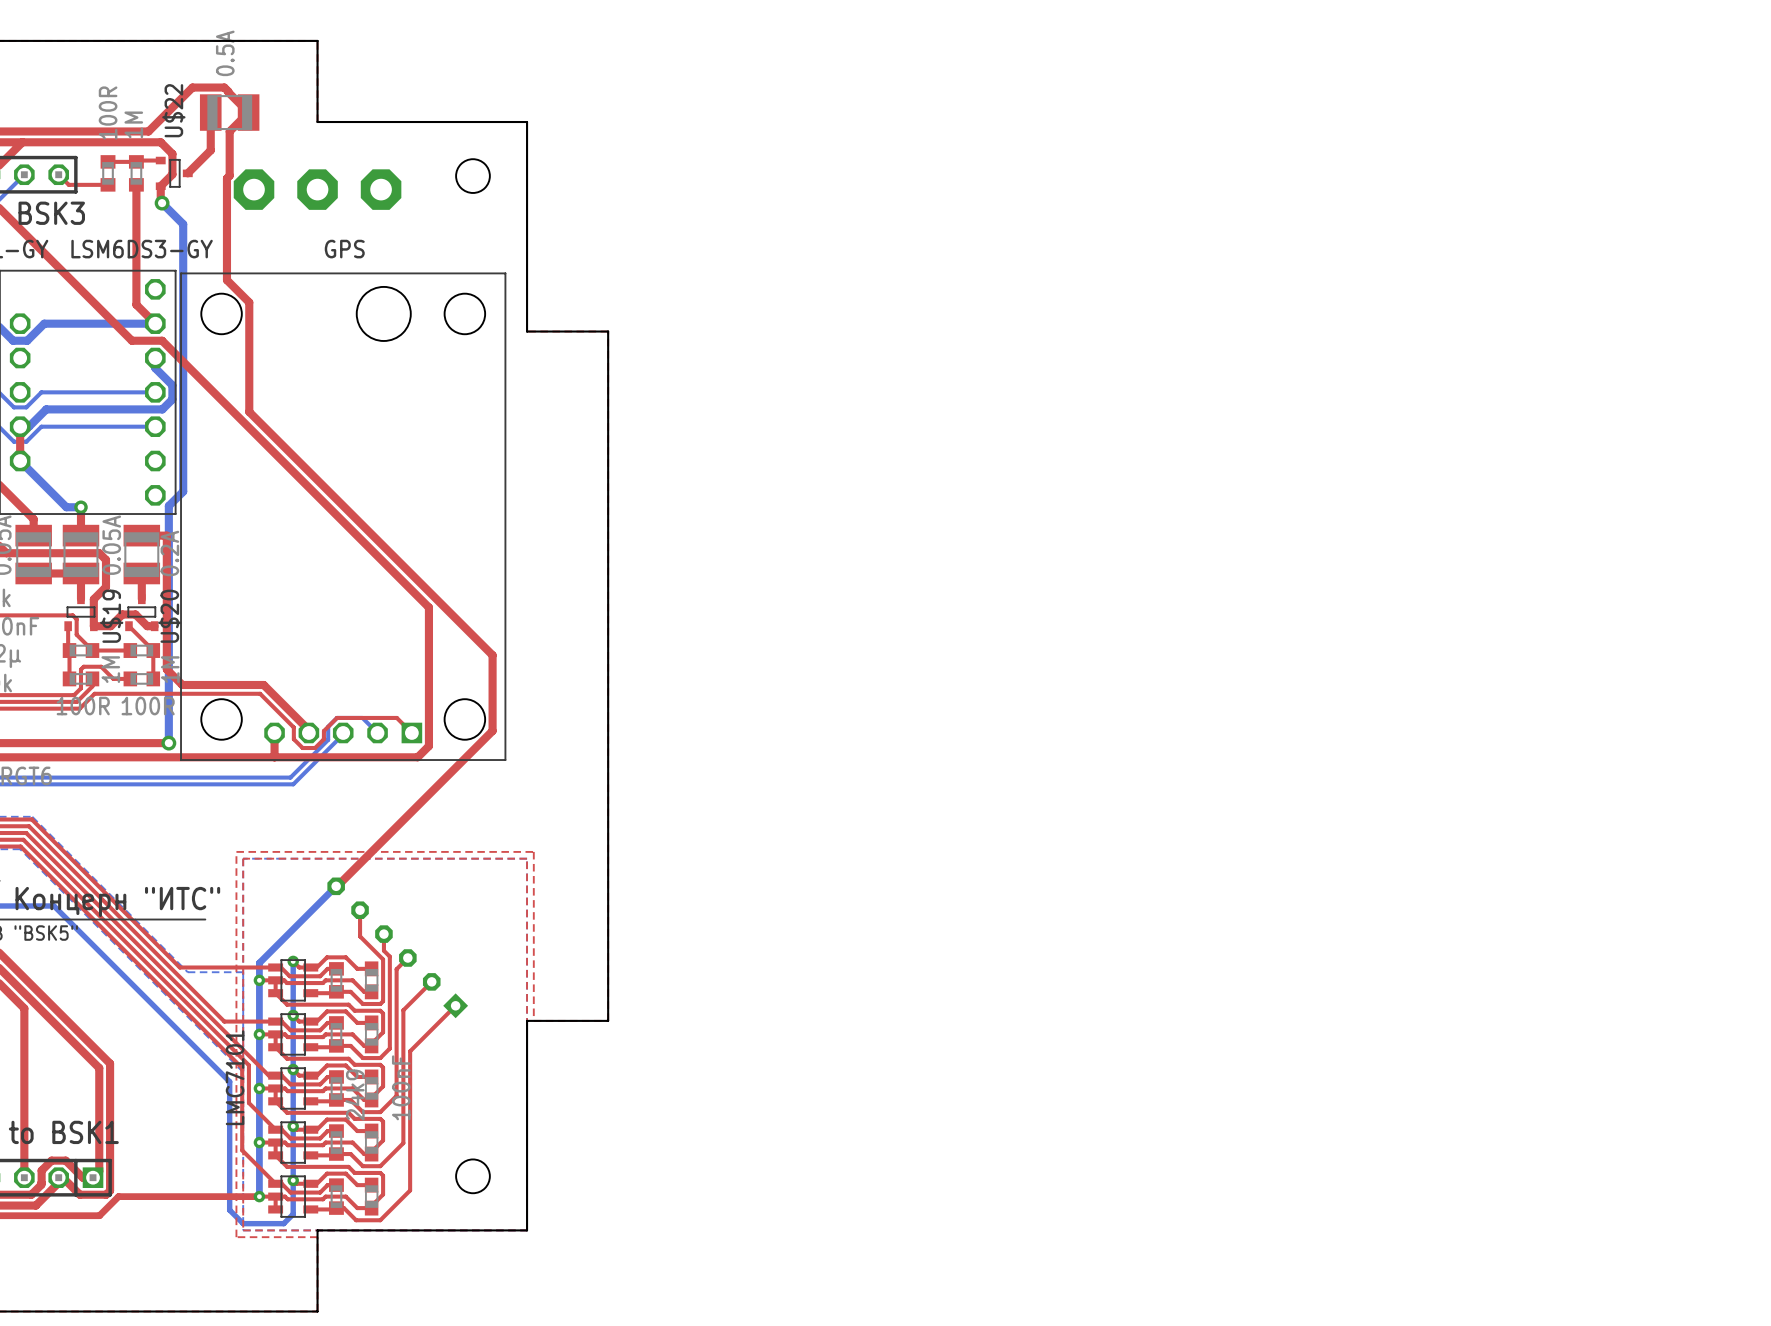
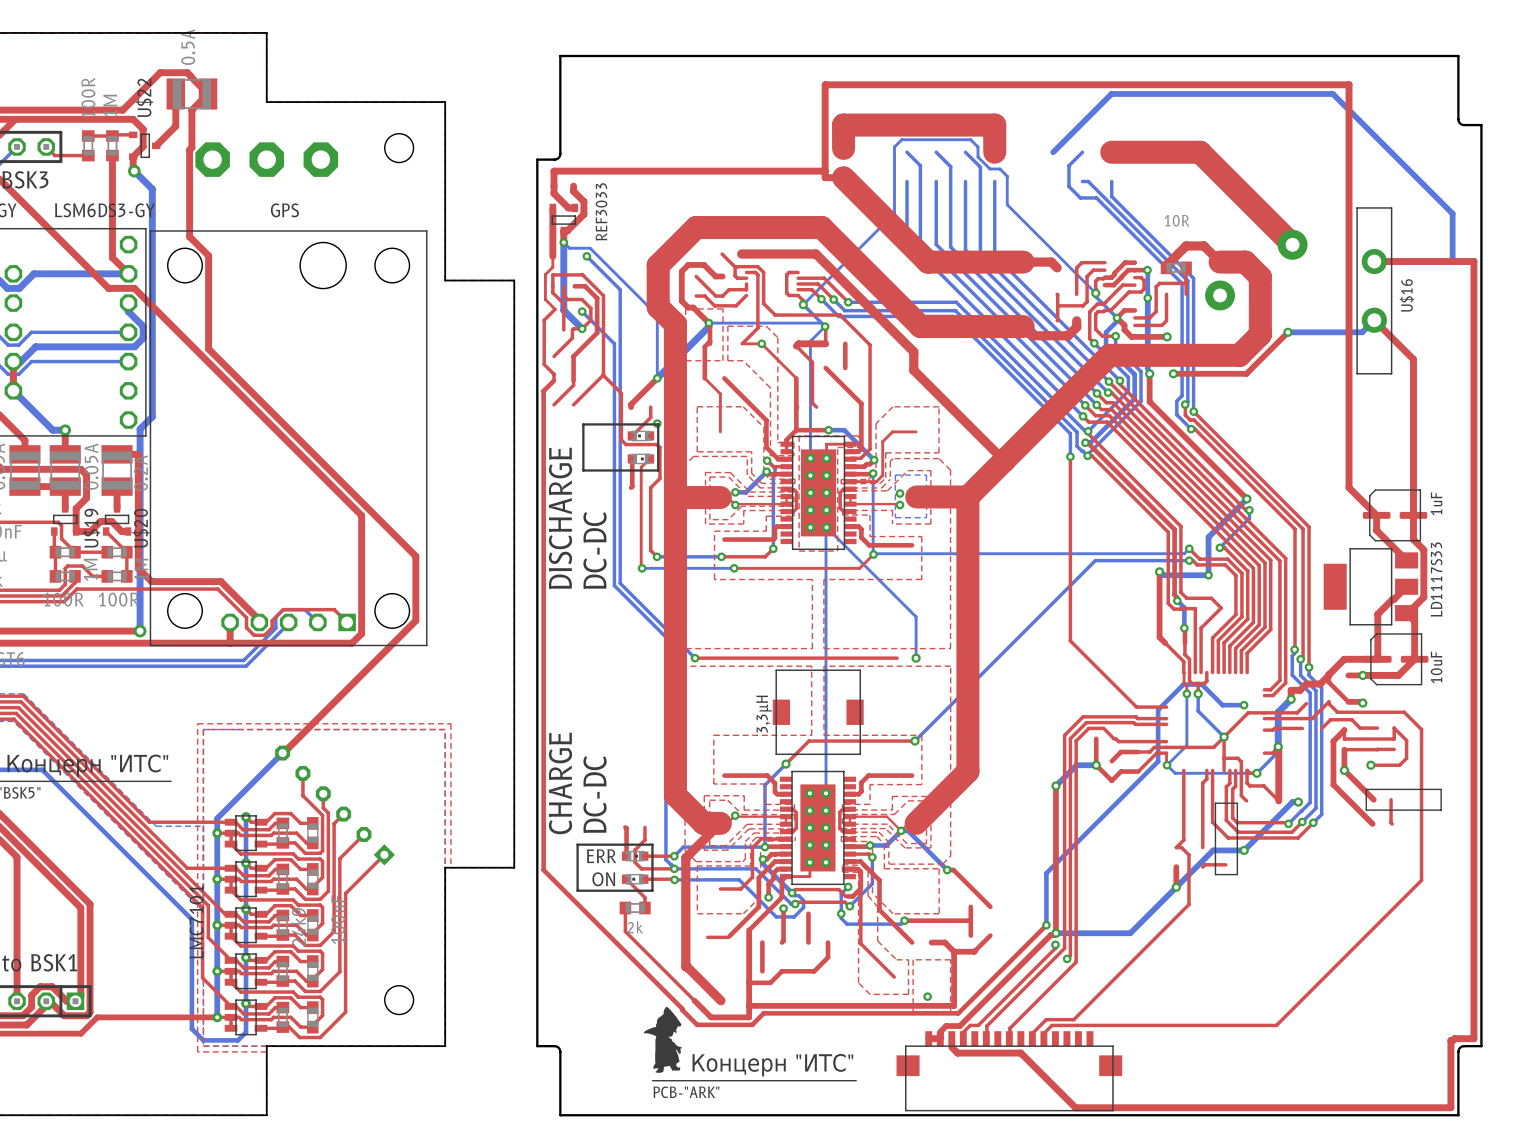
board edge: none -> (560, 55) (1458, 55) (1458, 120) (1463, 125) (1481, 125) (1481, 1046) (1463, 1046) (1458, 1050) (1458, 1115) (560, 1115) (560, 1050) (555, 1046) (537, 1046) (537, 159) (555, 159) (560, 155) (560, 55)
top track: none -> (843, 148) (843, 125) (994, 125) (994, 152)
bottom track: none -> (907, 152) (920, 165) (920, 240) (1085, 405)
bottom track: none -> (936, 152) (950, 166) (950, 247) (1097, 393)
bottom track: none -> (965, 152) (980, 167) (980, 253) (1108, 381)
bottom track: none -> (1053, 152) (1111, 93) (1332, 93) (1452, 213) (1452, 261) (1374, 261)
bottom track: none -> (1082, 152) (1068, 165) (1068, 186) (1080, 197) (1096, 197) (1182, 283) (1182, 395) (1176, 401) (1176, 414) (1191, 429)
top track: none -> (1111, 152) (1200, 152) (1292, 244)
top track: none -> (825, 171) (554, 171) (554, 193) (568, 207) (574, 207)
bottom track: none -> (907, 181) (907, 240) (1083, 416)
bottom track: none -> (936, 181) (936, 244) (1096, 405)
bottom track: none -> (965, 181) (965, 250) (1108, 392)
bottom track: none -> (994, 181) (994, 255) (1119, 380)
bottom track: none -> (1082, 181) (1088, 181) (1187, 281) (1187, 401) (1185, 404)
bottom track: none -> (1111, 181) (1111, 196) (1193, 278) (1193, 411)
top track: none -> (573, 186) (573, 191) (583, 201) (583, 214) (567, 231) (563, 231) (563, 242)
top track: none -> (552, 207) (552, 267) (545, 274) (545, 299) (555, 309) (544, 320) (544, 364) (554, 374) (554, 380) (543, 391) (543, 870) (697, 1024) (752, 1024) (763, 1013) (958, 1013) (1046, 925)
REF3033: none -> (563, 219)
via: none -> (563, 242)
via: none -> (1292, 244)
top track: none -> (722, 254) (735, 267)
top track: none -> (741, 254) (815, 254) (913, 351) (913, 370) (1004, 460)
bottom track: none -> (586, 256) (620, 289) (620, 583) (695, 658)
via: none -> (586, 256)
top track: none -> (1374, 261) (1473, 261) (1473, 1038) (1450, 1040) (1450, 1107) (1075, 1107) (1020, 1053) (957, 1053) (951, 1047) (951, 1038)
top track: none -> (1104, 262) (1081, 262) (1076, 267) (1076, 294)
top track: none -> (1134, 262) (1125, 262) (1111, 277) (1098, 278) (1095, 281) (1095, 293)
top track: none -> (735, 267) (735, 275) (737, 278) (746, 278)
top track: none -> (735, 267) (757, 266) (763, 272) (763, 303) (775, 315) (840, 315) (870, 344) (870, 449) (860, 458) (850, 459)
top track: none -> (1057, 267) (1051, 262) (927, 262) (843, 177) (825, 177) (825, 84) (1349, 84) (1349, 487) (1376, 515) (1376, 530) (1406, 560)
top track: none -> (1166, 267) (1166, 265) (1186, 245) (1203, 245) (1220, 262) (1245, 262) (1260, 277) (1260, 334) (1239, 355) (1109, 355) (967, 496)
part: none -> 10R (1176, 267)
top track: none -> (1186, 267) (1186, 294)
top track: none -> (1104, 270) (1093, 270) (1087, 276) (1087, 301) (1082, 305) (1057, 305)
top track: none -> (1147, 270) (1128, 270) (1113, 285) (1104, 285)
bottom track: none -> (1147, 270) (1147, 368)
via: none -> (1147, 270)
top track: none -> (746, 272) (755, 272) (757, 274) (757, 328) (742, 343)
top track: none -> (798, 272) (789, 272) (786, 274) (786, 293) (789, 295) (798, 295) (803, 300) (803, 304)
top track: none -> (696, 276) (715, 296) (722, 296) (729, 289) (746, 289) (746, 283)
top track: none -> (722, 276) (715, 276) (704, 264) (688, 264) (681, 271) (681, 301) (688, 307) (693, 307) (710, 324) (710, 343)
top track: none -> (798, 278) (824, 278) (848, 302)
top track: none -> (1134, 277) (1141, 277) (1144, 280) (1144, 289) (1141, 292) (1129, 292) (1110, 310) (1098, 311) (1095, 313) (1095, 329) (1102, 336) (1115, 336)
top track: none -> (1186, 282) (1159, 283) (1156, 286) (1156, 311) (1149, 317) (1134, 317)
top track: none -> (798, 283) (818, 283) (833, 299)
top track: none -> (1134, 285) (1122, 285) (1103, 304) (1097, 304) (1089, 311) (1089, 338) (1094, 343)
top track: none -> (563, 286) (563, 295) (567, 299) (581, 299) (590, 308) (590, 320) (582, 328) (573, 328) (572, 338) (554, 356)
top track: none -> (574, 286) (585, 286) (597, 298) (597, 332) (573, 356) (573, 385) (554, 404)
top track: none -> (798, 289) (811, 289) (821, 299)
U$16: none -> (1374, 290)
via: none -> (1095, 293)
top track: none -> (1057, 294) (1057, 320)
top track: none -> (1166, 294) (1166, 320) (1161, 325) (1134, 325)
top track: none -> (746, 295) (736, 305) (714, 305) (704, 296) (696, 296)
via: none -> (1220, 295)
via: none -> (1147, 298)
bottom track: none -> (821, 299) (838, 316) (953, 316) (1070, 433) (1070, 456)
via: none -> (821, 299)
bottom track: none -> (833, 299) (844, 310) (955, 310) (1077, 432) (1077, 446) (1087, 455) (1140, 401) (1140, 371) (1115, 346) (1115, 336)
via: none -> (833, 299)
bottom track: none -> (848, 302) (956, 302) (1085, 431) (1088, 431) (1128, 391) (1128, 377) (1094, 343)
via: none -> (848, 302)
via: none -> (803, 304)
top zone outline: none -> (685, 308) (723, 308) (723, 360) (685, 360) (685, 308)
top track: none -> (1134, 310) (1124, 310) (1117, 317) (1131, 336) (1167, 336)
bottom track: none -> (582, 311) (614, 343) (614, 585) (665, 637) (665, 859) (675, 868)
via: none -> (582, 311)
via: none -> (1117, 317)
top track: none -> (1076, 320) (1076, 327) (1068, 335) (1032, 335) (1023, 326) (920, 326) (821, 227) (696, 227) (658, 265) (658, 306) (675, 324) (675, 795) (703, 823) (720, 823)
top track: none -> (1374, 320) (1413, 359) (1413, 539) (1423, 549) (1423, 597) (1406, 613) (1414, 621) (1414, 659) (1398, 675) (1348, 675)
bottom track: none -> (1374, 320) (1362, 332) (1287, 332)
via: none -> (708, 323)
top zone outline: none -> (727, 326) (727, 360) (743, 360) (770, 387) (770, 455) (793, 455) (793, 442) (777, 442) (777, 337) (766, 326) (727, 326)
top track: none -> (825, 326) (825, 343) (798, 343) (796, 346) (812, 362) (812, 403) (816, 407)
bottom track: none -> (825, 326) (803, 304) (894, 213) (894, 147) (901, 139) (970, 139) (978, 147) (978, 157) (989, 168) (999, 168) (1007, 176) (1007, 204) (1095, 293) (1095, 296) (1117, 317) (1117, 321) (1106, 332) (1106, 345) (1134, 374) (1134, 398) (1090, 442) (1085, 442)
bottom track: none -> (825, 326) (810, 341) (810, 458)
bottom track: none -> (825, 326) (821, 323) (708, 323) (708, 326) (657, 378) (657, 315) (590, 248) (569, 248) (563, 242) (563, 310) (582, 328)
via: none -> (825, 326)
via: none -> (582, 328)
top track: none -> (563, 330) (563, 303) (552, 292) (552, 274) (582, 274) (603, 295) (603, 374) (573, 404)
top track: none -> (1287, 332) (1246, 373) (1173, 373)
via: none -> (1287, 332)
via: none -> (1115, 336)
via: none -> (1167, 336)
top track: none -> (710, 341) (704, 346) (704, 378) (720, 393) (720, 431)
top track: none -> (743, 342) (761, 343) (796, 378) (796, 430)
via: none -> (761, 343)
top track: none -> (845, 343) (845, 368)
via: none -> (1094, 343)
top track: none -> (825, 368) (861, 403) (861, 448) (858, 451) (850, 451)
top track: none -> (1149, 373) (1149, 401) (1246, 498)
via: none -> (1149, 373)
via: none -> (1173, 373)
top track: none -> (603, 375) (621, 393) (621, 439) (626, 444) (657, 444) (659, 447) (659, 478) (650, 487) (650, 550) (657, 556)
top track: none -> (657, 378) (631, 404) (631, 407)
via: none -> (657, 378)
top track: none -> (724, 378) (766, 420) (766, 447) (778, 459) (786, 459)
top track: none -> (1119, 380) (1119, 384) (1245, 510) (1249, 510)
via: none -> (1119, 380)
top track: none -> (1108, 381) (1285, 558) (1285, 682) (1272, 695) (1264, 695)
via: none -> (1108, 381)
top track: none -> (1108, 392) (1111, 392) (1279, 561) (1279, 680) (1270, 689) (1264, 689)
via: none -> (1108, 392)
top track: none -> (1097, 393) (1106, 402) (1113, 402) (1270, 560) (1270, 629) (1247, 653) (1247, 672)
via: none -> (1097, 393)
top track: none -> (1096, 405) (1101, 409) (1111, 409) (1264, 562) (1264, 627) (1241, 650) (1241, 672)
via: none -> (1096, 405)
top track: none -> (1185, 404) (1185, 415) (1190, 420) (1193, 420) (1303, 529) (1303, 658) (1300, 659)
via: none -> (1185, 404)
top track: none -> (1085, 405) (1095, 415) (1109, 415) (1259, 565) (1259, 624) (1235, 648) (1235, 672)
via: none -> (1085, 405)
top zone outline: none -> (697, 406) (697, 451) (751, 451) (751, 473) (761, 483) (794, 483) (794, 479) (769, 479) (763, 473) (763, 427) (743, 406) (697, 406)
top zone outline: none -> (892, 406) (939, 406) (939, 452) (885, 452) (885, 477) (879, 483) (841, 483) (841, 479) (868, 479) (876, 471) (876, 423) (892, 406)
top track: none -> (650, 407) (650, 417) (632, 435)
top track: none -> (1193, 411) (1309, 526) (1309, 667)
via: none -> (1193, 411)
top track: none -> (1083, 416) (1088, 422) (1107, 422) (1253, 568) (1253, 622) (1229, 646) (1229, 672)
via: none -> (1083, 416)
via: none -> (657, 423)
line: none -> (583, 424) (658, 424) (658, 470) (583, 470) (583, 424)
top track: none -> (1191, 429) (1194, 429) (1295, 529) (1294, 649)
via: none -> (1191, 429)
top track: none -> (796, 430) (828, 430)
top track: none -> (796, 430) (786, 439) (786, 451)
bottom track: none -> (828, 430) (844, 430) (874, 460)
via: none -> (828, 430)
top track: none -> (1088, 431) (1088, 433) (1180, 526) (1180, 592) (1186, 598) (1211, 598) (1221, 608) (1201, 628) (1201, 672)
via: none -> (1088, 431)
top track: none -> (916, 431) (892, 431) (882, 441) (882, 475) (876, 481) (850, 481)
part: none -> (640, 435)
top zone outline: none -> (799, 435) (858, 435) (858, 447) (837, 447) (837, 551) (799, 551) (799, 435)
top track: none -> (1085, 442) (1087, 442) (1174, 529) (1174, 595) (1177, 600)
via: none -> (1085, 442)
top track: none -> (850, 444) (826, 444) (826, 458)
top track: none -> (1087, 455) (1091, 455) (1168, 532) (1168, 603) (1173, 609) (1195, 608) (1195, 672)
via: none -> (1087, 455)
top zone outline: none -> (693, 456) (746, 456) (747, 474) (760, 487) (792, 487) (792, 492) (749, 492) (730, 472) (705, 472) (705, 524) (743, 524) (743, 510) (793, 510) (793, 516) (766, 516) (766, 531) (714, 531) (714, 579) (812, 579) (812, 648) (685, 648) (685, 464) (693, 456)
top track: none -> (1070, 456) (1070, 640) (1136, 707) (1166, 707)
via: none -> (1070, 456)
top zone outline: none -> (892, 458) (939, 458) (950, 470) (950, 648) (823, 648) (823, 579) (921, 579) (921, 536) (869, 536) (869, 515) (842, 515) (842, 510) (892, 510) (892, 524) (930, 524) (930, 470) (907, 470) (887, 490) (842, 490) (842, 487) (881, 487) (890, 479) (890, 461) (892, 458)
top track: none -> (632, 458) (631, 487)
part: none -> (640, 458)
top track: none -> (649, 458) (641, 467) (642, 568)
top track: none -> (874, 460) (864, 466) (850, 466)
via: none -> (874, 460)
top track: none -> (767, 460) (773, 466) (786, 466)
bottom track: none -> (767, 460) (775, 468) (773, 476) (773, 548)
via: none -> (767, 460)
top track: none -> (766, 471) (769, 474) (786, 474)
bottom track: none -> (766, 471) (746, 492) (735, 492)
via: none -> (766, 471)
top track: none -> (873, 473) (850, 474)
bottom track: none -> (873, 473) (873, 553) (1184, 553) (1189, 548)
via: none -> (873, 473)
bottom zone outline: none -> (895, 475) (895, 517) (926, 517) (926, 475) (895, 475)
top zone outline: none -> (709, 477) (709, 519) (728, 519) (741, 506) (793, 506) (793, 496) (748, 496) (728, 477) (709, 477)
top track: none -> (786, 489) (794, 490) (796, 492) (796, 508) (793, 511) (786, 511)
top track: none -> (850, 489) (842, 490) (840, 492) (840, 508) (843, 511) (850, 511)
via: none -> (735, 492)
part: none -> (818, 492)
via: none -> (899, 493)
top track: none -> (786, 496) (786, 504) (735, 505) (727, 497) (675, 498)
top track: none -> (850, 496) (850, 504) (899, 505)
top track: none -> (916, 496) (967, 496)
top track: none -> (967, 496) (967, 771) (916, 823) (908, 823) (901, 830) (886, 816) (849, 816) (849, 824)
bottom track: none -> (1246, 498) (1208, 537) (1208, 575) (1163, 575) (1159, 571)
via: none -> (1246, 498)
text: none -> DISCHARGE (560, 518)
via: none -> (735, 505)
via: none -> (899, 505)
bottom track: none -> (1249, 510) (1249, 518) (1219, 547)
via: none -> (1249, 510)
part: none -> 1uF (1395, 515)
top track: none -> (786, 526) (776, 526) (773, 539) (724, 539)
top track: none -> (850, 526) (858, 526) (861, 529) (861, 537) (869, 545) (912, 545)
text: none -> DC-DC (595, 550)
top track: none -> (1219, 547) (1224, 547) (1247, 570) (1247, 619) (1224, 642) (1224, 672)
via: none -> (1219, 547)
top track: none -> (773, 548) (765, 556) (721, 556)
via: none -> (773, 548)
top track: none -> (1189, 548) (1199, 559) (1227, 559) (1241, 573) (1241, 616) (1218, 640) (1218, 672)
via: none -> (1189, 548)
top track: none -> (873, 554) (859, 568) (734, 568)
via: none -> (873, 554)
bottom track: none -> (657, 556) (721, 556)
via: none -> (657, 556)
via: none -> (721, 556)
top track: none -> (1189, 560) (1193, 560) (1197, 564) (1225, 564) (1235, 575) (1235, 614) (1212, 638) (1212, 672)
bottom track: none -> (1189, 560) (1095, 560) (914, 741)
via: none -> (1189, 560)
bottom track: none -> (642, 568) (734, 568)
via: none -> (642, 568)
via: none -> (734, 568)
top track: none -> (1159, 571) (1159, 637) (1183, 661) (1184, 683) (1186, 686) (1186, 693)
via: none -> (1159, 571)
via: none -> (1208, 575)
LD1117S33: none -> (1370, 586)
top track: none -> (1406, 586) (1377, 614) (1377, 659) (1344, 659) (1328, 675)
bottom track: none -> (1177, 600) (1184, 607) (1184, 628)
via: none -> (1177, 600)
top track: none -> (1184, 628) (1184, 654) (1189, 659) (1189, 681) (1191, 683) (1204, 683) (1206, 681) (1206, 672)
via: none -> (1184, 628)
bottom track: none -> (1294, 649) (1292, 655) (1292, 675) (1310, 693) (1310, 802) (1288, 823)
via: none -> (1294, 649)
top track: none -> (695, 658) (897, 658)
via: none -> (695, 658)
bottom track: none -> (916, 658) (916, 616) (826, 527) (826, 793)
via: none -> (916, 658)
bottom track: none -> (1300, 659) (1300, 675) (1315, 690) (1315, 808) (1302, 821)
via: none -> (1300, 659)
part: none -> 10uF (1396, 659)
top zone outline: none -> (685, 666) (811, 666) (811, 735) (713, 735) (713, 783) (765, 783) (765, 804) (794, 804) (794, 810) (744, 810) (744, 795) (704, 795) (704, 850) (727, 850) (748, 828) (793, 828) (793, 833) (753, 833) (745, 841) (745, 859) (742, 861) (696, 861) (685, 850) (685, 666)
top zone outline: none -> (824, 666) (950, 666) (950, 856) (942, 864) (889, 864) (888, 842) (878, 832) (842, 832) (842, 828) (885, 828) (904, 847) (930, 847) (930, 796) (892, 796) (892, 810) (842, 810) (842, 804) (870, 804) (870, 784) (921, 784) (921, 735) (824, 735) (824, 666)
bottom track: none -> (1309, 667) (1309, 675) (1321, 688) (1321, 814) (1313, 822)
via: none -> (1309, 667)
top track: none -> (1328, 675) (1328, 682) (1348, 701) (1362, 703)
top track: none -> (1328, 675) (1320, 684) (1306, 684) (1300, 690) (1291, 690) (1291, 699)
via: none -> (1362, 675)
top track: none -> (1198, 683) (1198, 693)
bottom track: none -> (1186, 693) (1186, 745) (1167, 765) (1175, 773) (1256, 773) (1278, 751) (1278, 712) (1291, 699)
via: none -> (1186, 693)
bottom track: none -> (1198, 693) (1198, 711) (1224, 737)
via: none -> (1198, 693)
via: none -> (1291, 699)
via: none -> (1362, 703)
top track: none -> (1306, 703) (1297, 712) (1248, 712) (1213, 747) (1154, 747) (1149, 751) (1121, 751) (1111, 761)
bottom track: none -> (1244, 705) (1222, 705) (1202, 684) (1183, 684) (1158, 709) (1158, 761) (1046, 873) (1046, 925)
via: none -> (1244, 705)
3,3µH: none -> (818, 712)
top track: none -> (1166, 718) (1083, 716) (1064, 735) (1064, 948) (986, 1026) (986, 1038)
top track: none -> (1264, 718) (1312, 718) (1328, 701) (1337, 712) (1404, 712) (1421, 729) (1421, 880) (1276, 1025) (1052, 1025) (1044, 1032) (1043, 1038)
top track: none -> (1166, 724) (1086, 722) (1070, 738) (1070, 955) (1067, 958)
top track: none -> (1302, 728) (1264, 730)
top track: none -> (1377, 728) (1360, 728) (1351, 719) (1330, 719) (1321, 728)
top track: none -> (1344, 730) (1344, 739) (1394, 739) (1394, 728) (1406, 740) (1406, 758) (1399, 765) (1370, 765)
top track: none -> (1344, 730) (1333, 741) (1333, 784) (1372, 823)
top track: none -> (1224, 737) (1224, 770)
via: none -> (1224, 737)
top track: none -> (1096, 738) (1096, 765) (1111, 780) (1121, 771) (1138, 771) (1156, 753) (1166, 753) (1167, 765)
top track: none -> (914, 741) (809, 741) (786, 764)
via: none -> (914, 741)
top track: none -> (1166, 741) (1118, 741) (1103, 728) (1088, 728) (1076, 741) (1076, 962) (1009, 1028) (1009, 1038)
via: none -> (1278, 746)
top track: none -> (1394, 749) (1344, 749) (1344, 770) (1373, 799)
top track: none -> (1264, 753) (1272, 753) (1278, 747) (1278, 800) (1263, 785) (1250, 785) (1247, 783) (1247, 770) (1250, 773) (1256, 773)
top track: none -> (1224, 758) (1237, 758) (1241, 761) (1241, 795) (1246, 800)
bottom track: none -> (786, 764) (764, 785) (764, 847) (683, 847) (674, 856)
via: none -> (786, 764)
bottom track: none -> (1096, 765) (1076, 765) (1055, 785)
via: none -> (1096, 765)
via: none -> (1167, 765)
via: none -> (1370, 765)
top track: none -> (1183, 770) (1183, 840) (1176, 847) (1181, 847) (1188, 855) (1188, 904) (1073, 1019) (1046, 1019) (1032, 1032) (1032, 1038)
top track: none -> (1206, 770) (1206, 778) (1202, 783) (1202, 847)
top track: none -> (1212, 770) (1212, 822) (1228, 837) (1298, 837) (1313, 822)
top track: none -> (1229, 770) (1229, 783) (1226, 786) (1226, 820) (1238, 832) (1292, 832) (1302, 821)
top track: none -> (1235, 770) (1235, 786) (1232, 789) (1232, 818) (1237, 822) (1288, 823)
via: none -> (1344, 770)
text: none -> CHARGE (560, 783)
via: none -> (1256, 773)
top track: none -> (724, 775) (767, 775) (774, 783) (774, 791) (777, 794) (785, 794)
top track: none -> (912, 775) (868, 775) (861, 782) (861, 791) (858, 794) (849, 794)
text: none -> DC-DC (595, 794)
top track: none -> (1055, 785) (1055, 933) (1050, 935) (959, 1026) (946, 1026) (940, 1031) (940, 1038) (928, 1038)
via: none -> (1055, 785)
line: none -> (1366, 789) (1441, 789) (1441, 810) (1366, 810) (1366, 789)
top zone outline: none -> (709, 800) (709, 845) (725, 845) (747, 824) (794, 824) (794, 814) (742, 814) (727, 800) (709, 800)
top track: none -> (1391, 799) (1392, 823)
top zone outline: none -> (908, 800) (894, 814) (842, 814) (842, 824) (887, 824) (906, 843) (926, 843) (926, 800) (908, 800)
bottom track: none -> (1298, 802) (1292, 802) (1244, 850) (1213, 850) (1130, 933) (1055, 933)
via: none -> (1298, 802)
line: none -> (1215, 803) (1237, 803) (1237, 874) (1215, 874) (1215, 803)
top track: none -> (786, 809) (792, 809) (796, 812) (796, 828) (793, 830) (786, 831)
top track: none -> (849, 809) (842, 810) (839, 812) (839, 828) (843, 831) (849, 831)
via: none -> (735, 815)
via: none -> (1302, 821)
top track: none -> (720, 823) (685, 857) (685, 966) (720, 1000)
top track: none -> (720, 823) (727, 823) (735, 815) (786, 816) (786, 824)
via: none -> (1313, 822)
via: none -> (1288, 823)
top track: none -> (625, 827) (626, 856)
top track: none -> (644, 827) (644, 840) (635, 849) (635, 862) (641, 868) (674, 868)
part: none -> (817, 827)
via: none -> (901, 830)
top zone outline: none -> (841, 836) (876, 836) (884, 844) (884, 868) (939, 868) (939, 913) (893, 913) (872, 893) (872, 847) (866, 841) (841, 841) (841, 836)
top zone outline: none -> (756, 837) (750, 843) (750, 865) (697, 865) (697, 913) (743, 913) (760, 896) (760, 848) (768, 840) (795, 840) (795, 837) (756, 837)
top track: none -> (790, 839) (761, 838) (752, 847) (752, 877) (740, 889) (720, 889)
line: none -> (577, 844) (652, 844) (652, 890) (577, 890) (577, 844)
top track: none -> (870, 845) (849, 846)
bottom track: none -> (870, 845) (886, 845) (901, 830) (908, 830) (947, 870)
via: none -> (870, 845)
via: none -> (764, 847)
top track: none -> (786, 846) (764, 847)
via: none -> (1244, 850)
top track: none -> (786, 854) (771, 854) (766, 859) (762, 859)
top track: none -> (849, 854) (869, 854) (872, 857)
text: none -> ERR (601, 856)
part: none -> (635, 856)
top track: none -> (643, 856) (674, 856)
via: none -> (674, 856)
bottom track: none -> (872, 857) (872, 883) (849, 906)
via: none -> (872, 857)
bottom track: none -> (762, 859) (762, 863) (794, 895) (798, 895) (803, 900) (803, 907) (794, 916) (776, 916) (739, 879) (674, 879)
via: none -> (762, 859)
top track: none -> (785, 861) (774, 861) (758, 877) (758, 906) (728, 937) (707, 937)
top track: none -> (849, 861) (860, 861) (879, 880) (879, 909) (912, 942)
top track: none -> (809, 862) (809, 876) (786, 876) (781, 880) (781, 897) (749, 930) (749, 1017) (711, 1017) (625, 931) (625, 908)
top zone outline: none -> (842, 864) (842, 872) (858, 872) (858, 982) (870, 994) (908, 994) (908, 959) (896, 959) (877, 940) (877, 907) (868, 895) (868, 871) (861, 865) (842, 864)
top track: none -> (1225, 864) (1205, 864) (1202, 867)
top track: none -> (1176, 867) (1176, 887)
bottom track: none -> (674, 868) (756, 868) (791, 904) (795, 904)
via: none -> (674, 868)
top track: none -> (785, 869) (777, 869) (773, 873) (773, 878) (768, 883) (768, 897)
top track: none -> (849, 869) (858, 869) (860, 871) (860, 888)
top track: none -> (947, 870) (953, 870) (990, 906)
via: none -> (947, 870)
text: none -> ON (603, 879)
top track: none -> (626, 879) (644, 897) (644, 908)
part: none -> (635, 879)
top track: none -> (643, 879) (674, 879)
via: none -> (674, 879)
bottom track: none -> (848, 886) (841, 893) (841, 918) (847, 924) (901, 924) (904, 920)
via: none -> (848, 886)
via: none -> (1176, 887)
top track: none -> (860, 888) (852, 896) (845, 896) (838, 889) (795, 889) (792, 893)
top track: none -> (860, 888) (860, 943) (894, 977)
via: none -> (792, 893)
via: none -> (768, 897)
top track: none -> (795, 904) (797, 902) (844, 902) (849, 906)
via: none -> (795, 904)
via: none -> (849, 906)
top track: none -> (970, 906) (970, 935)
part: none -> 2k (635, 908)
top track: none -> (783, 908) (783, 940) (781, 942)
via: none -> (783, 908)
top track: none -> (808, 913) (808, 942)
via: none -> (841, 913)
top track: none -> (904, 920) (970, 920)
via: none -> (904, 920)
via: none -> (1046, 925)
via: none -> (1055, 933)
top track: none -> (990, 935) (974, 951) (954, 951)
top track: none -> (762, 942) (762, 971)
top track: none -> (828, 942) (828, 957) (814, 971) (781, 971) (770, 982) (749, 982)
top track: none -> (931, 942) (944, 942) (954, 951)
top track: none -> (1055, 944) (1055, 948) (978, 1025) (970, 1025) (963, 1031) (963, 1038)
via: none -> (1055, 944)
top track: none -> (954, 951) (954, 1005) (749, 1005)
via: none -> (1067, 958)
top zone outline: none -> (913, 959) (913, 1011) (950, 1011) (950, 959) (913, 959)
via: none -> (927, 996)
drawing: none -> [643, 1006, 857, 1082]
part: none -> (1009, 1071)

